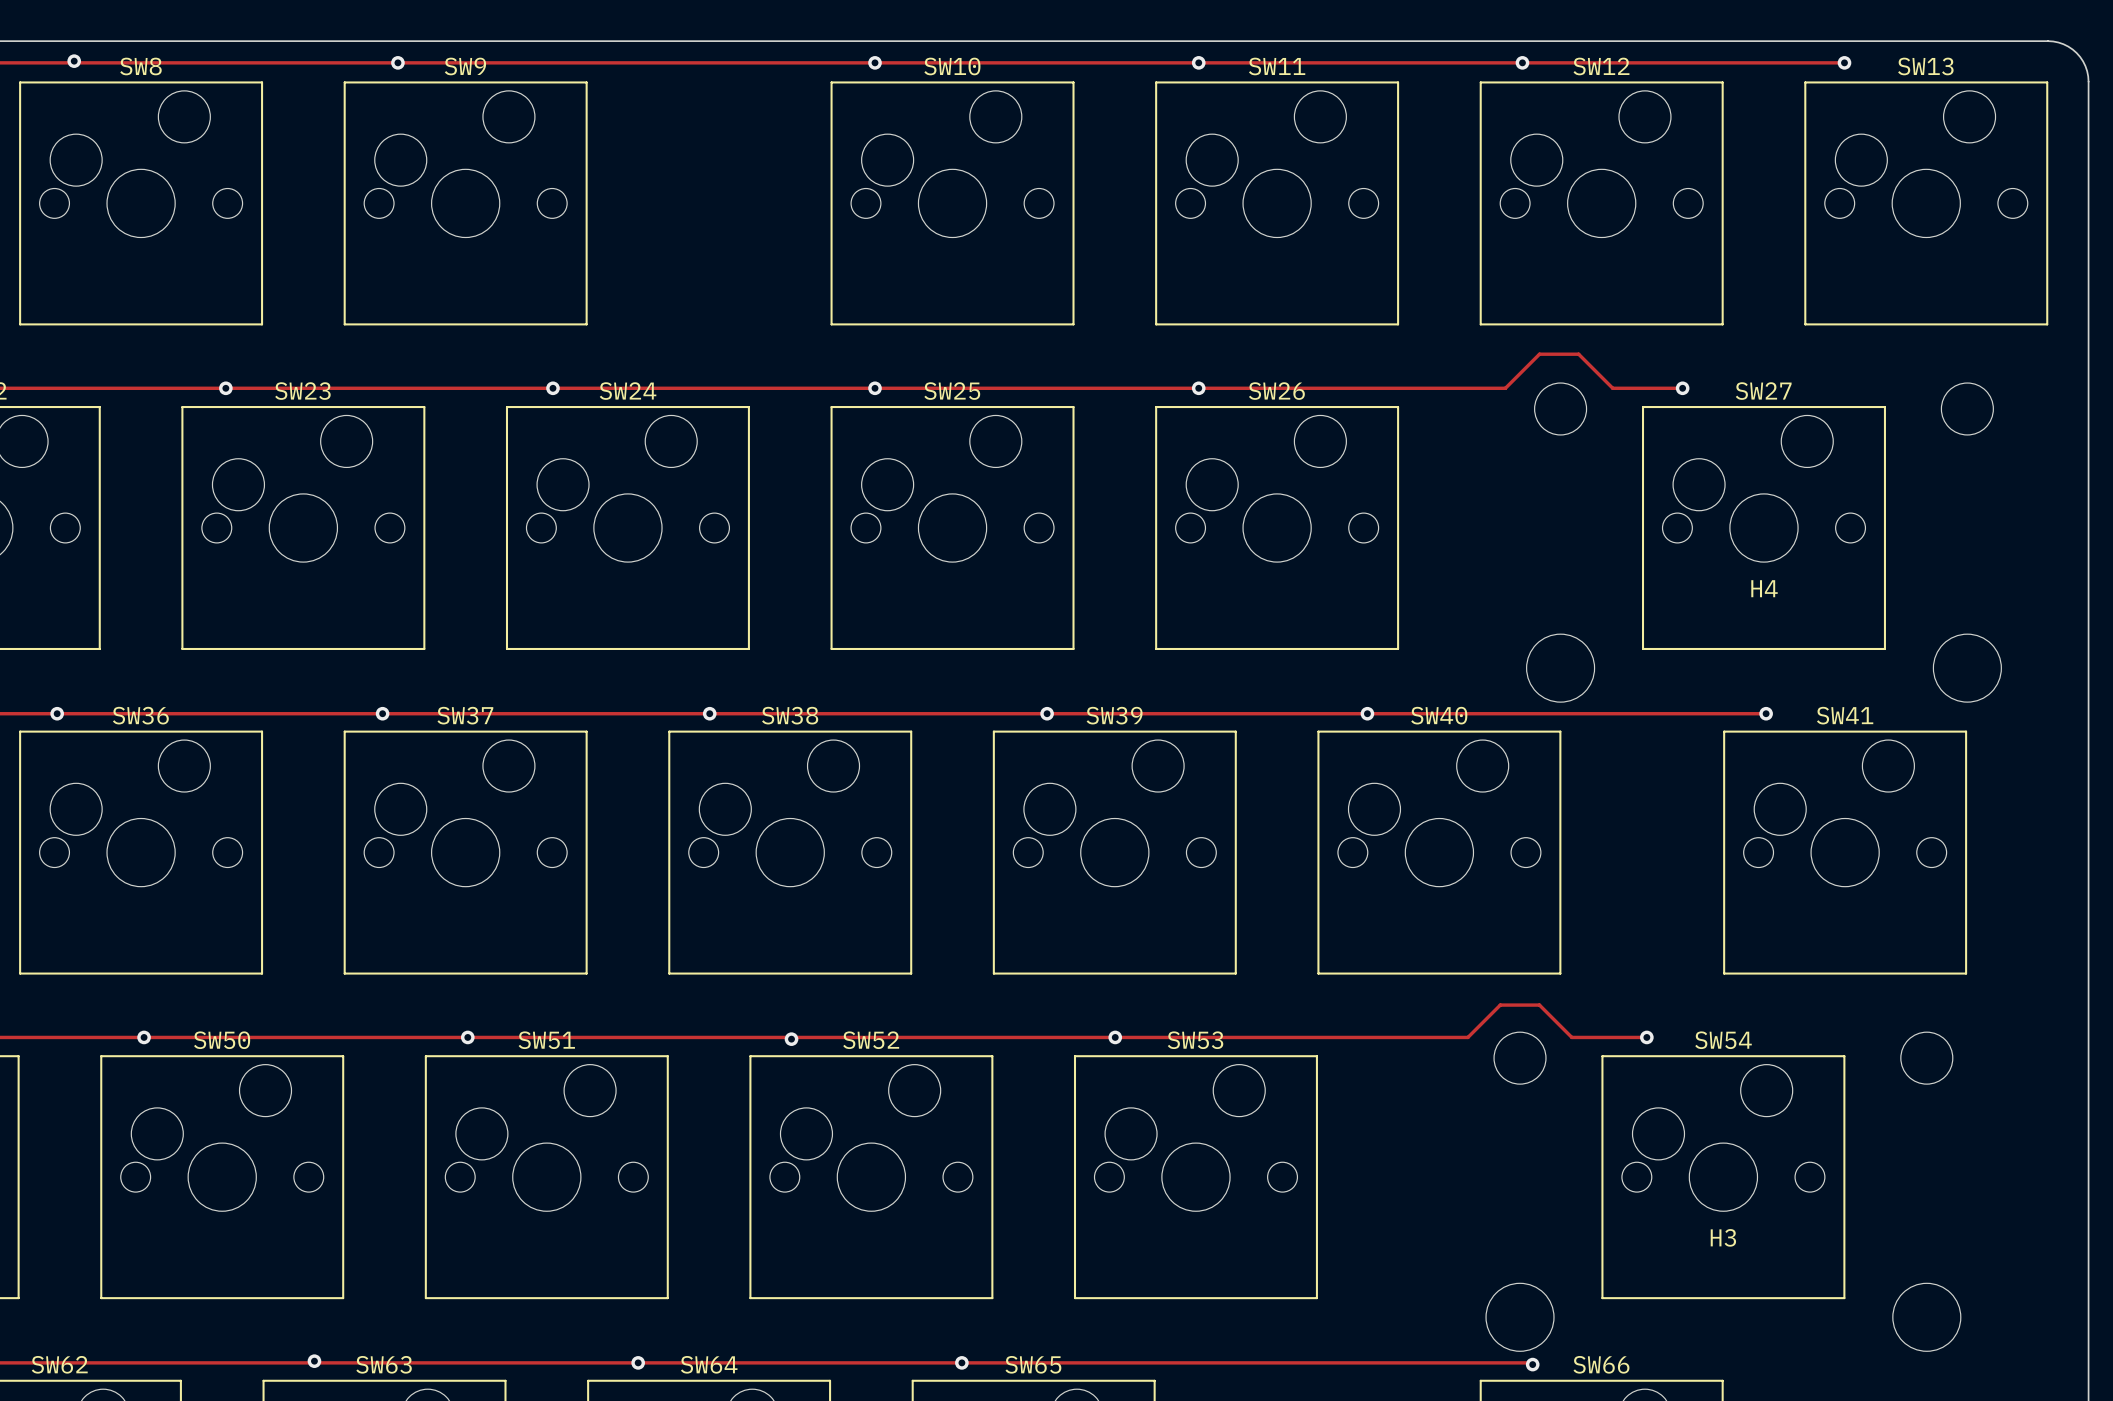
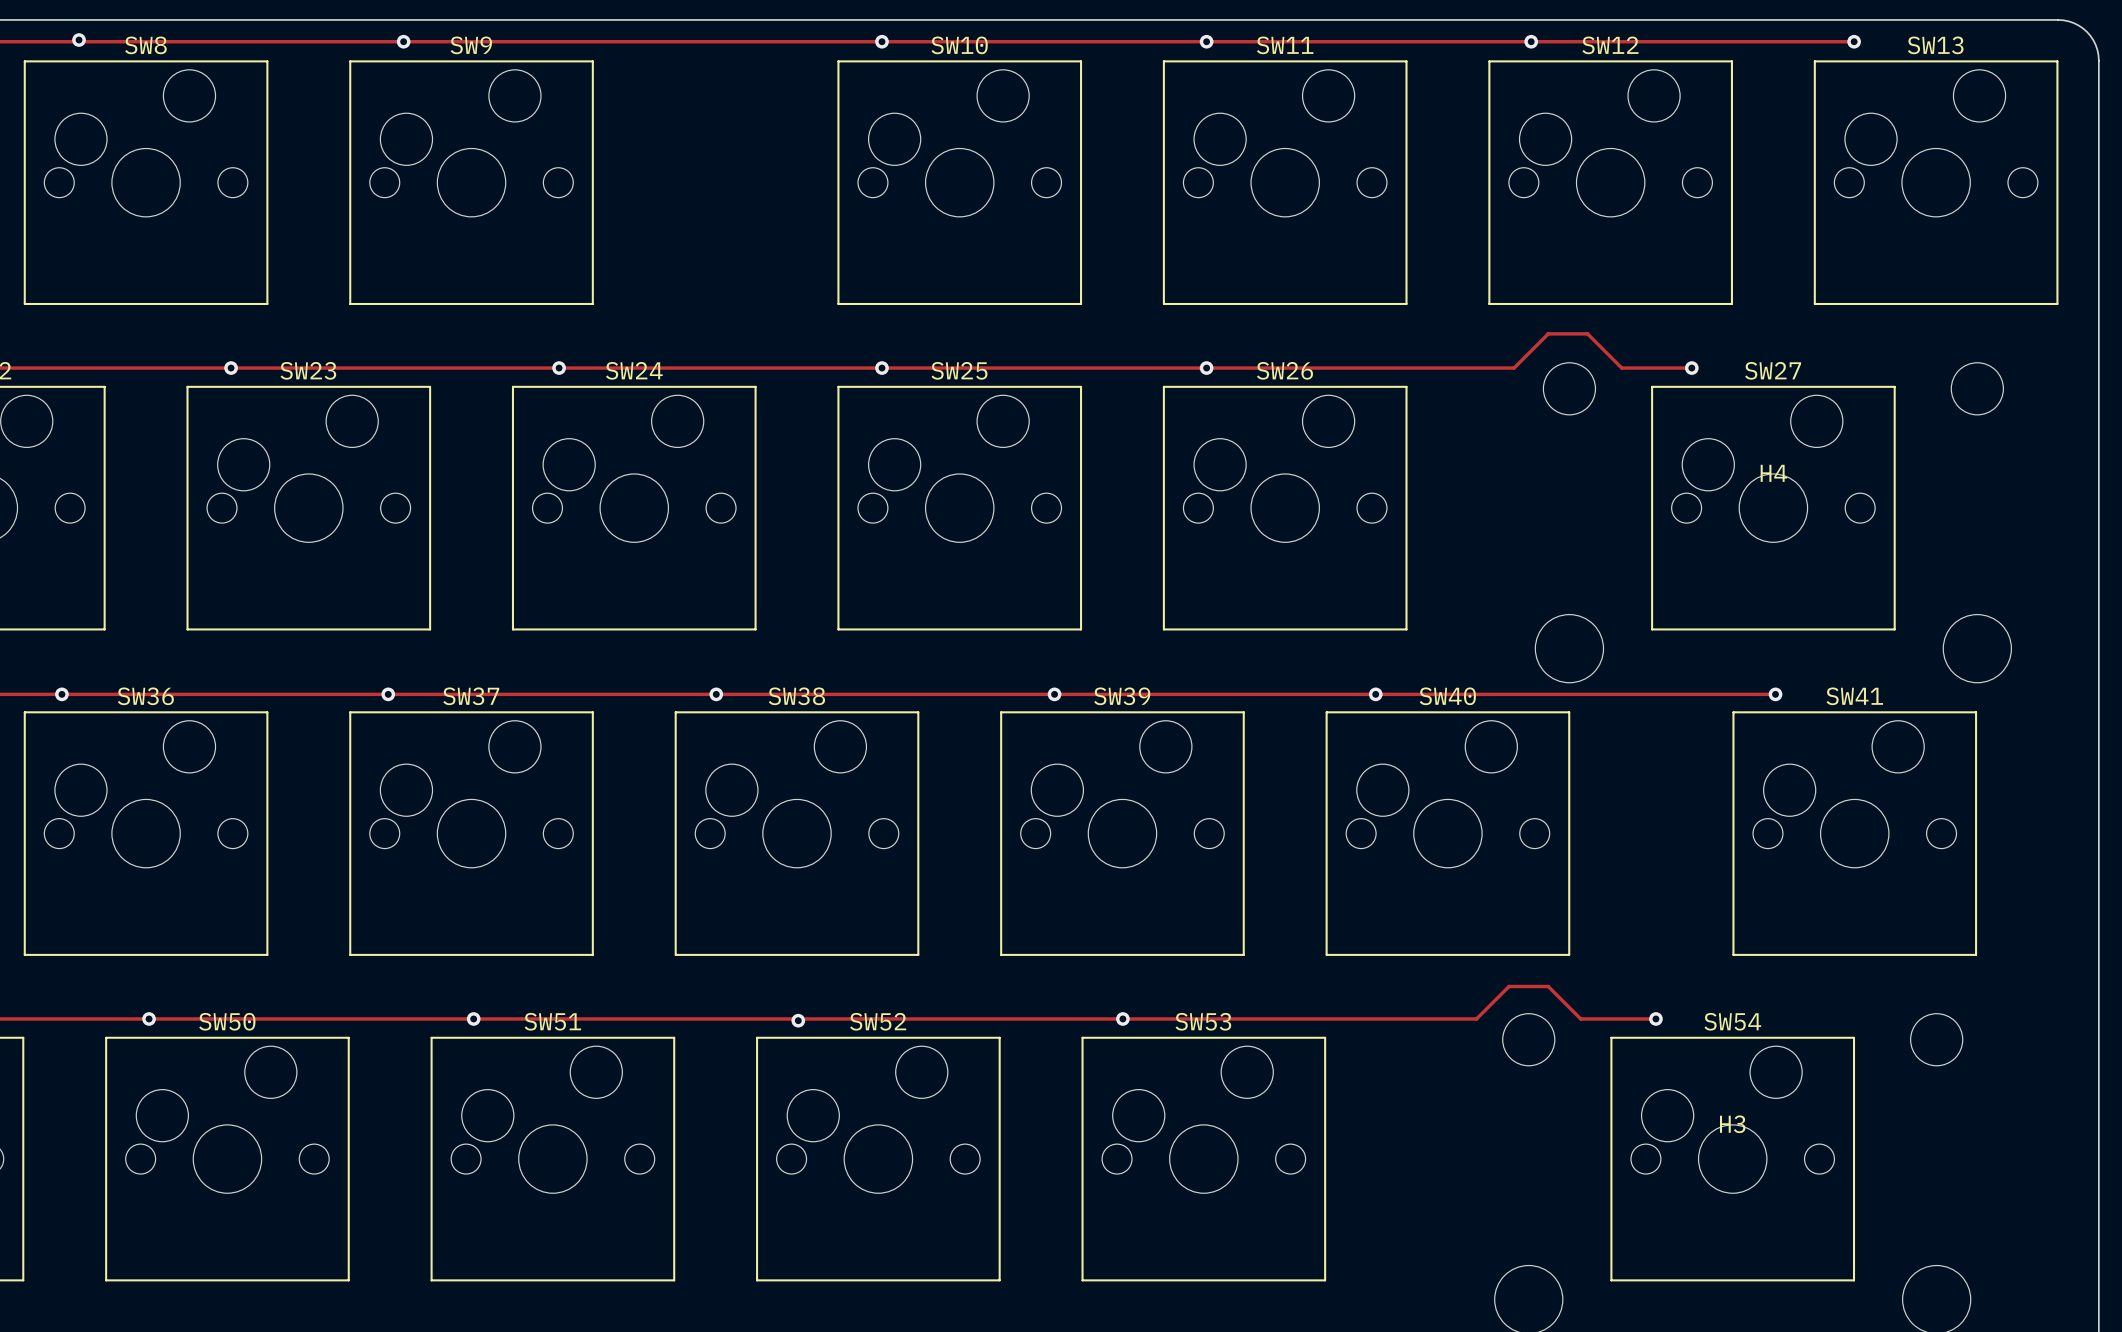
H4 name position: H4 (1764, 588) -> H4 (1773, 473)
H3 name position: H3 (1723, 1237) -> H3 (1732, 1124)

